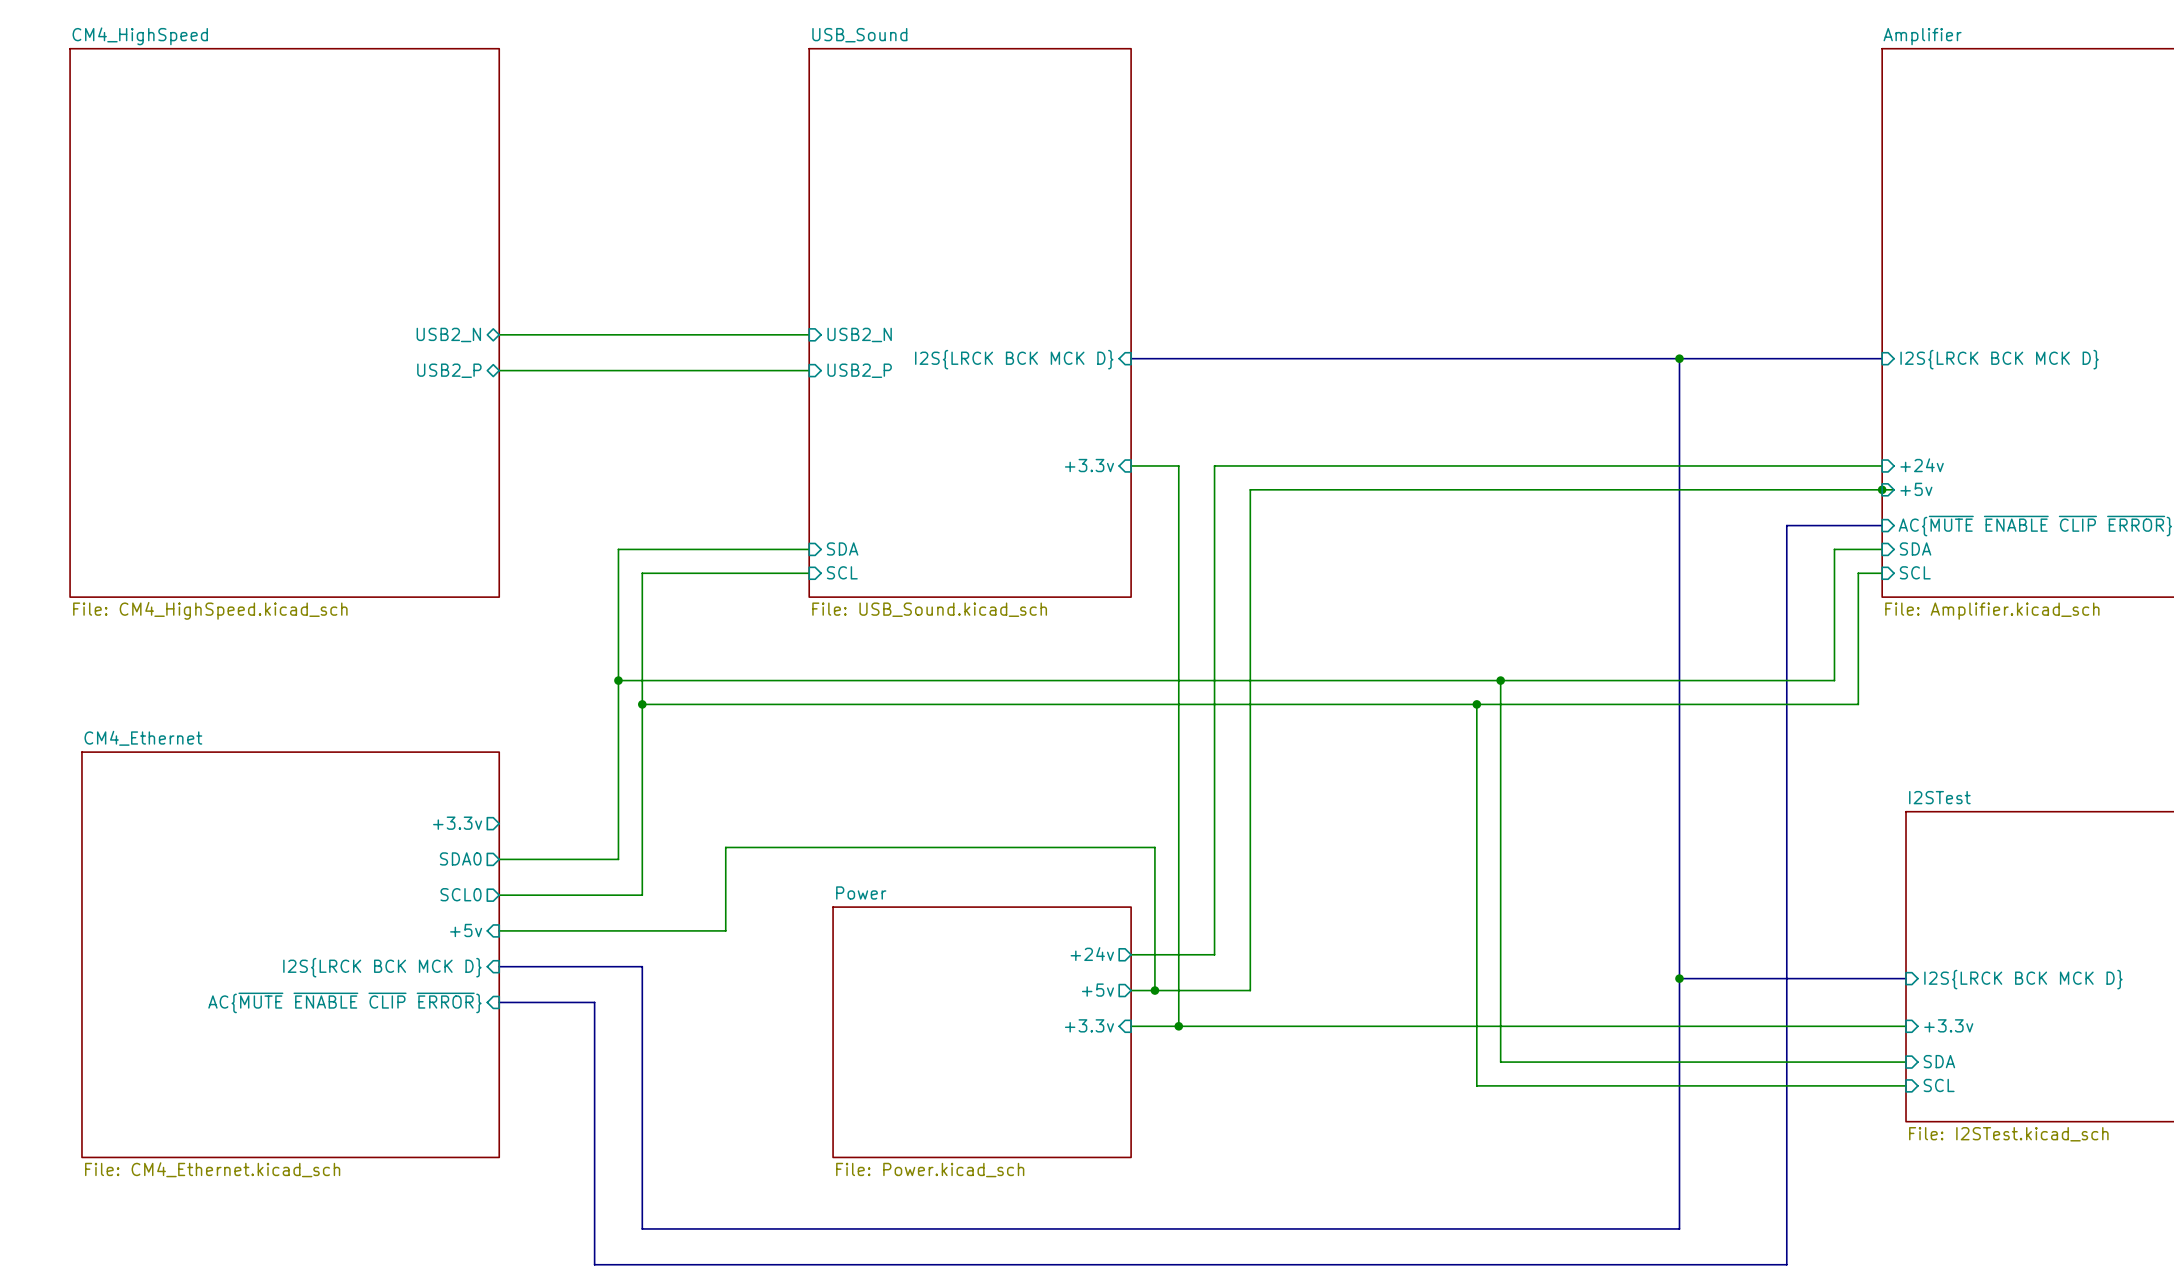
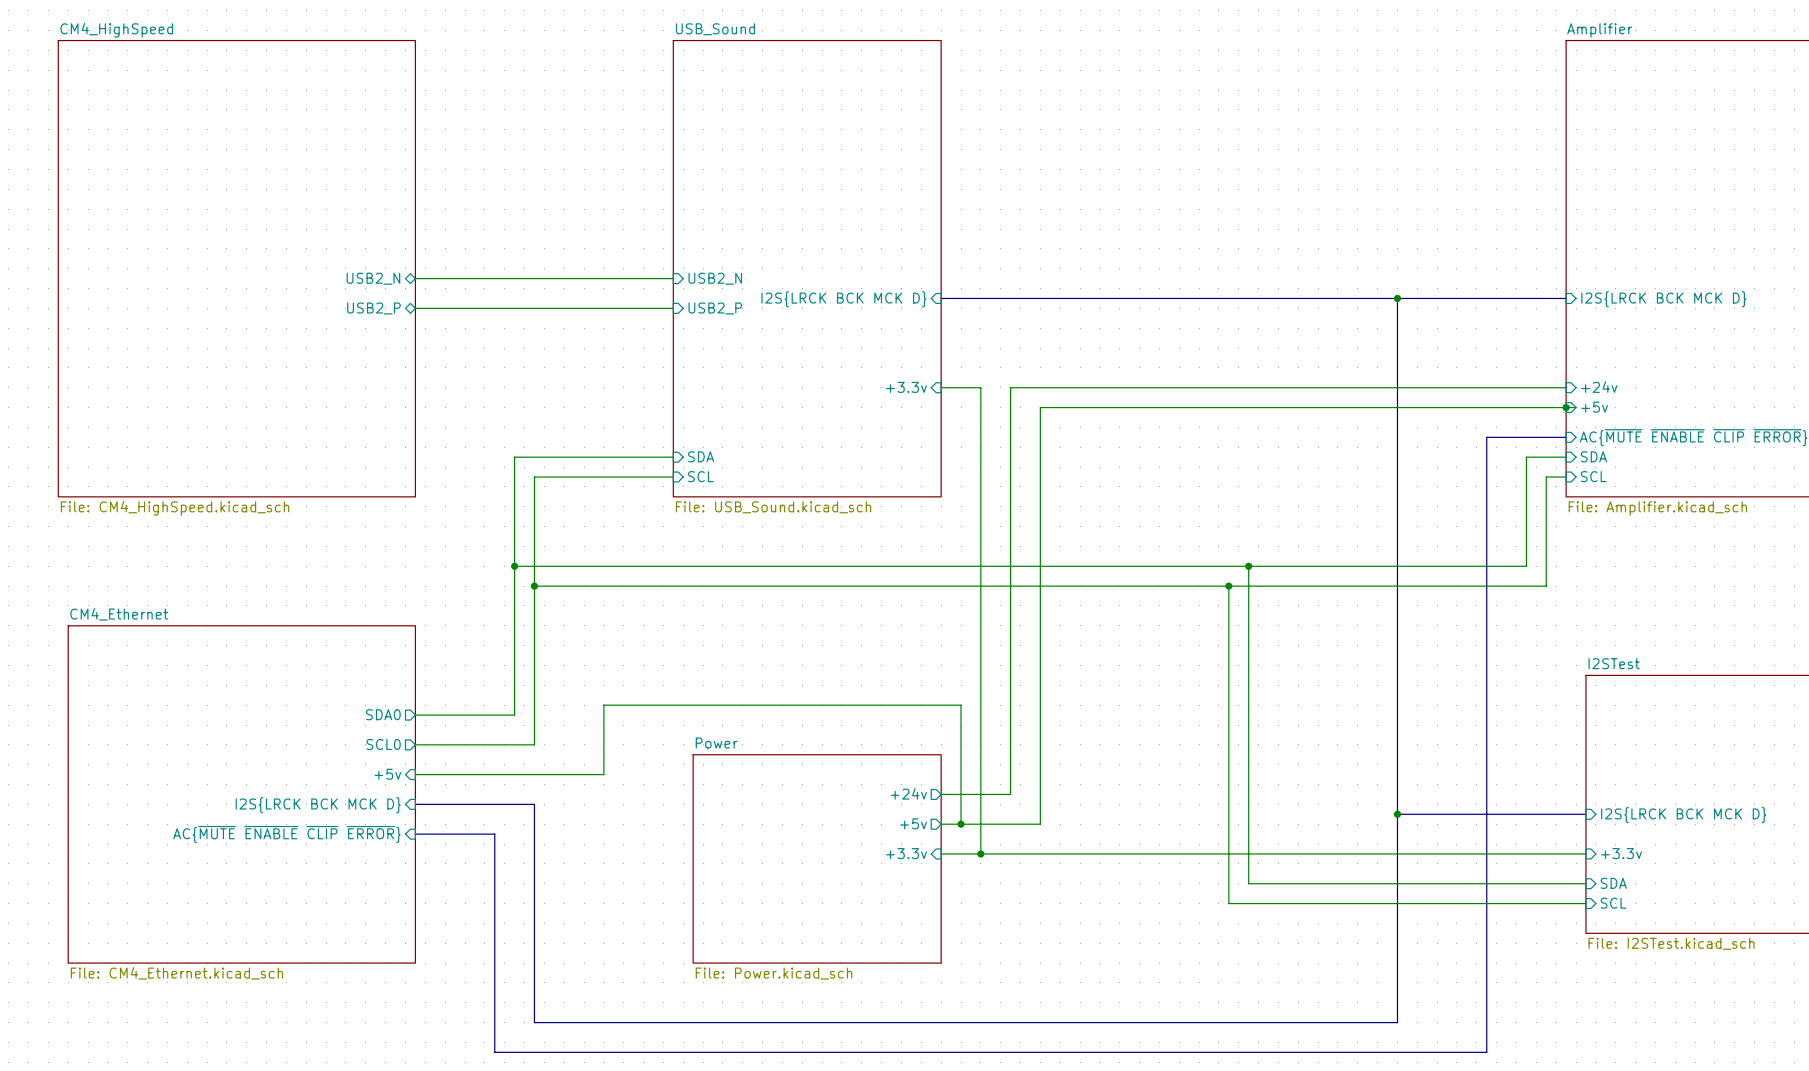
sheet pin: +3.3v (457, 823) -> none

